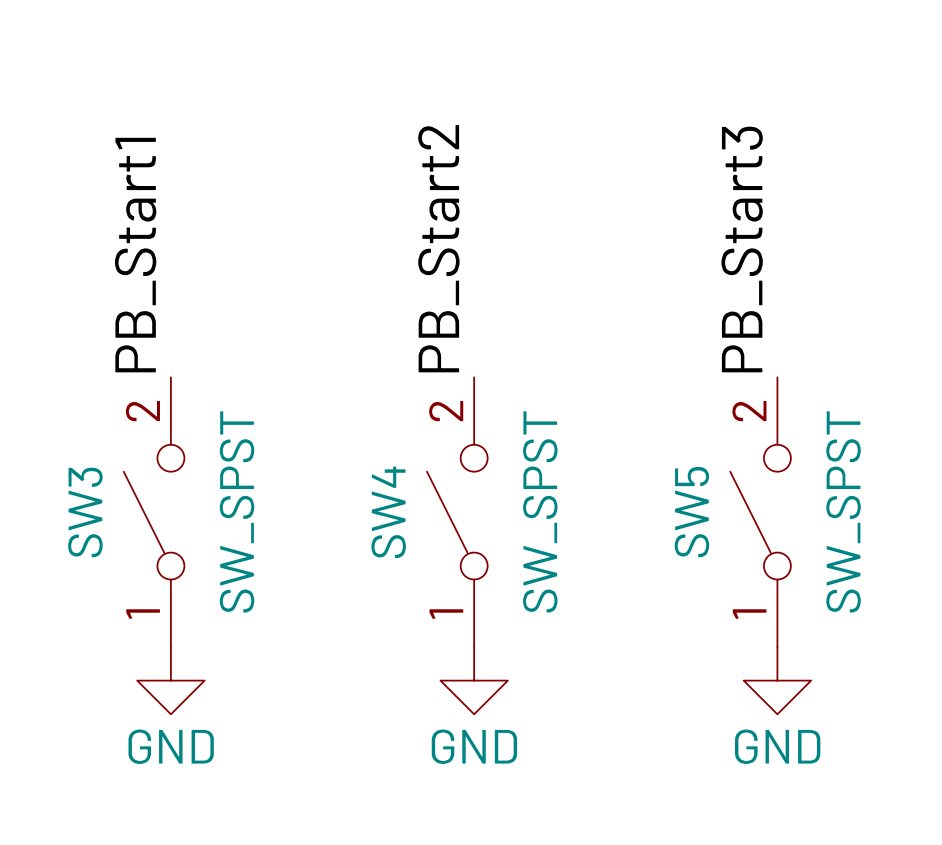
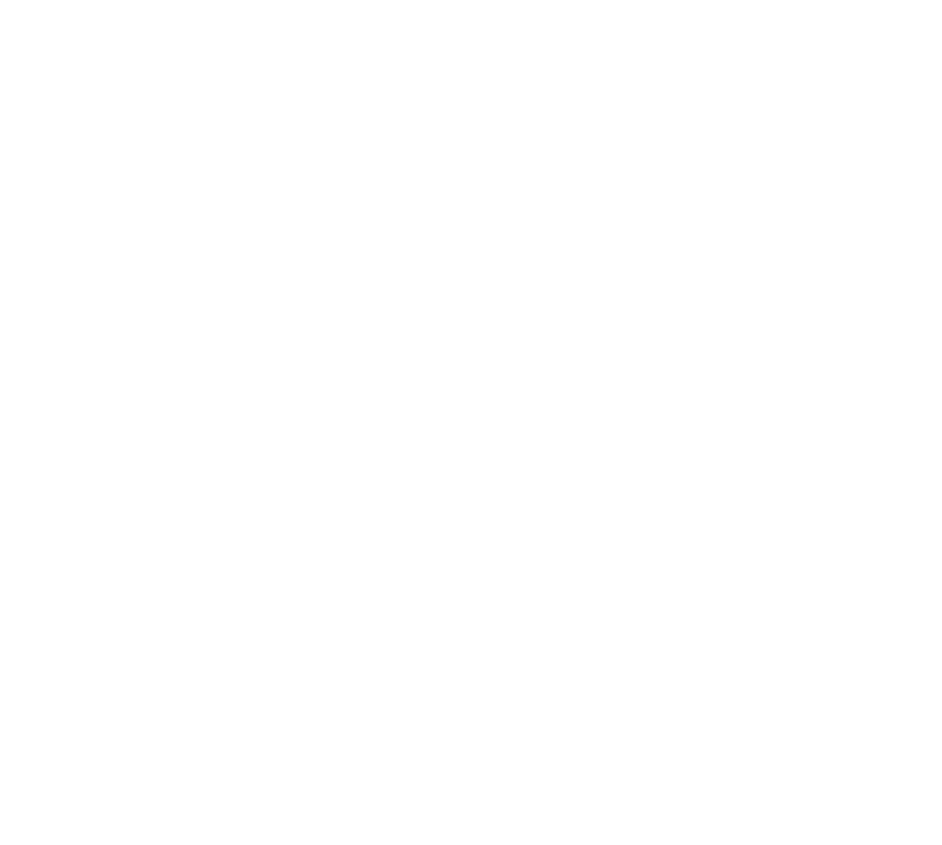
label: PB_Start2 (438, 248) -> none
label: PB_Start3 (742, 249) -> none
label: PB_Start1 (135, 255) -> none
SW3: SW_SPST (154, 512) -> none
SW4: SW_SPST (457, 512) -> none
SW5: SW_SPST (760, 512) -> none
power symbol: GND (170, 680) -> none
power symbol: GND (474, 680) -> none
power symbol: GND (777, 680) -> none

